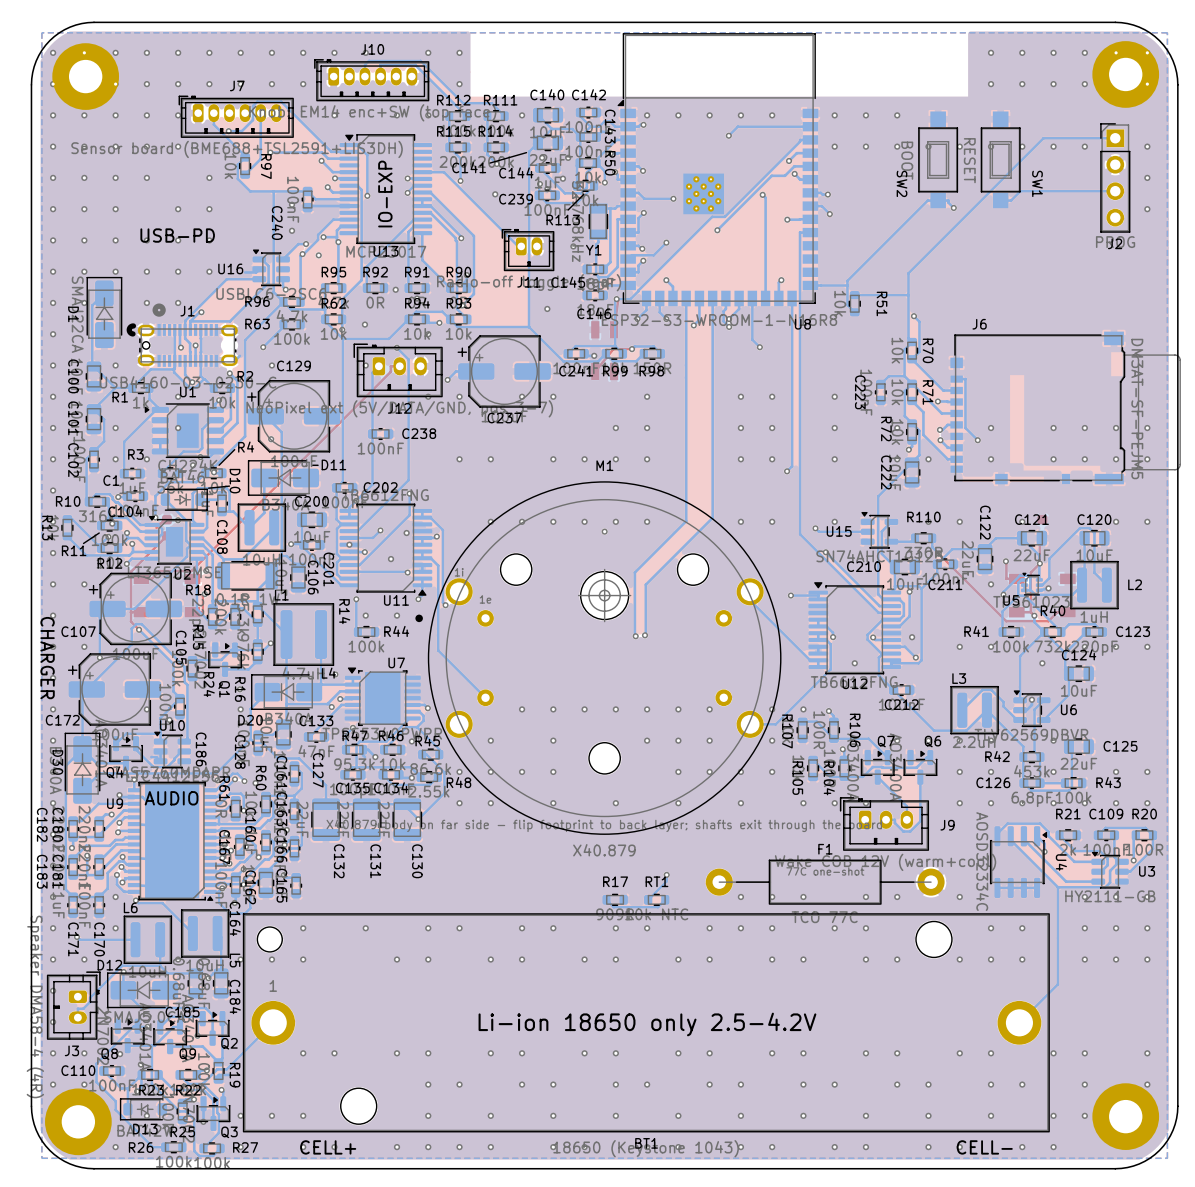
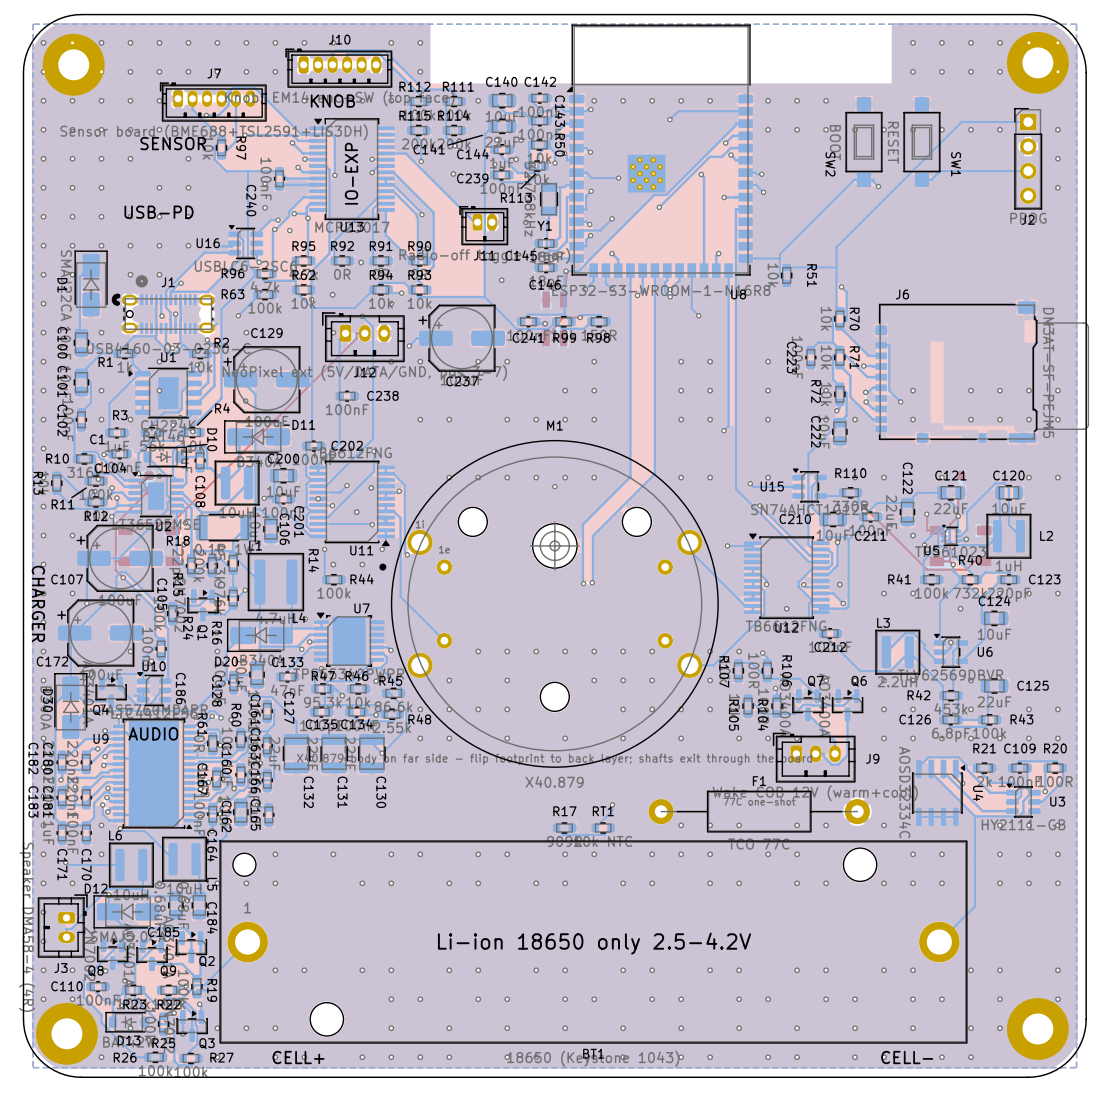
text: none -> KNOB (332, 101)
text: none -> SENSOR (173, 143)

